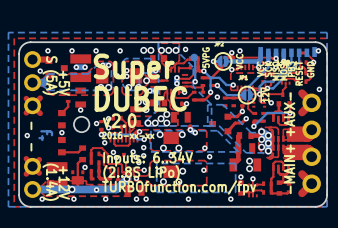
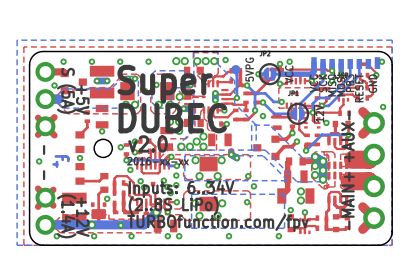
via: (126, 76) -> none
part: (225, 101) -> none
part: none -> (277, 121)
part: (233, 101) -> none

